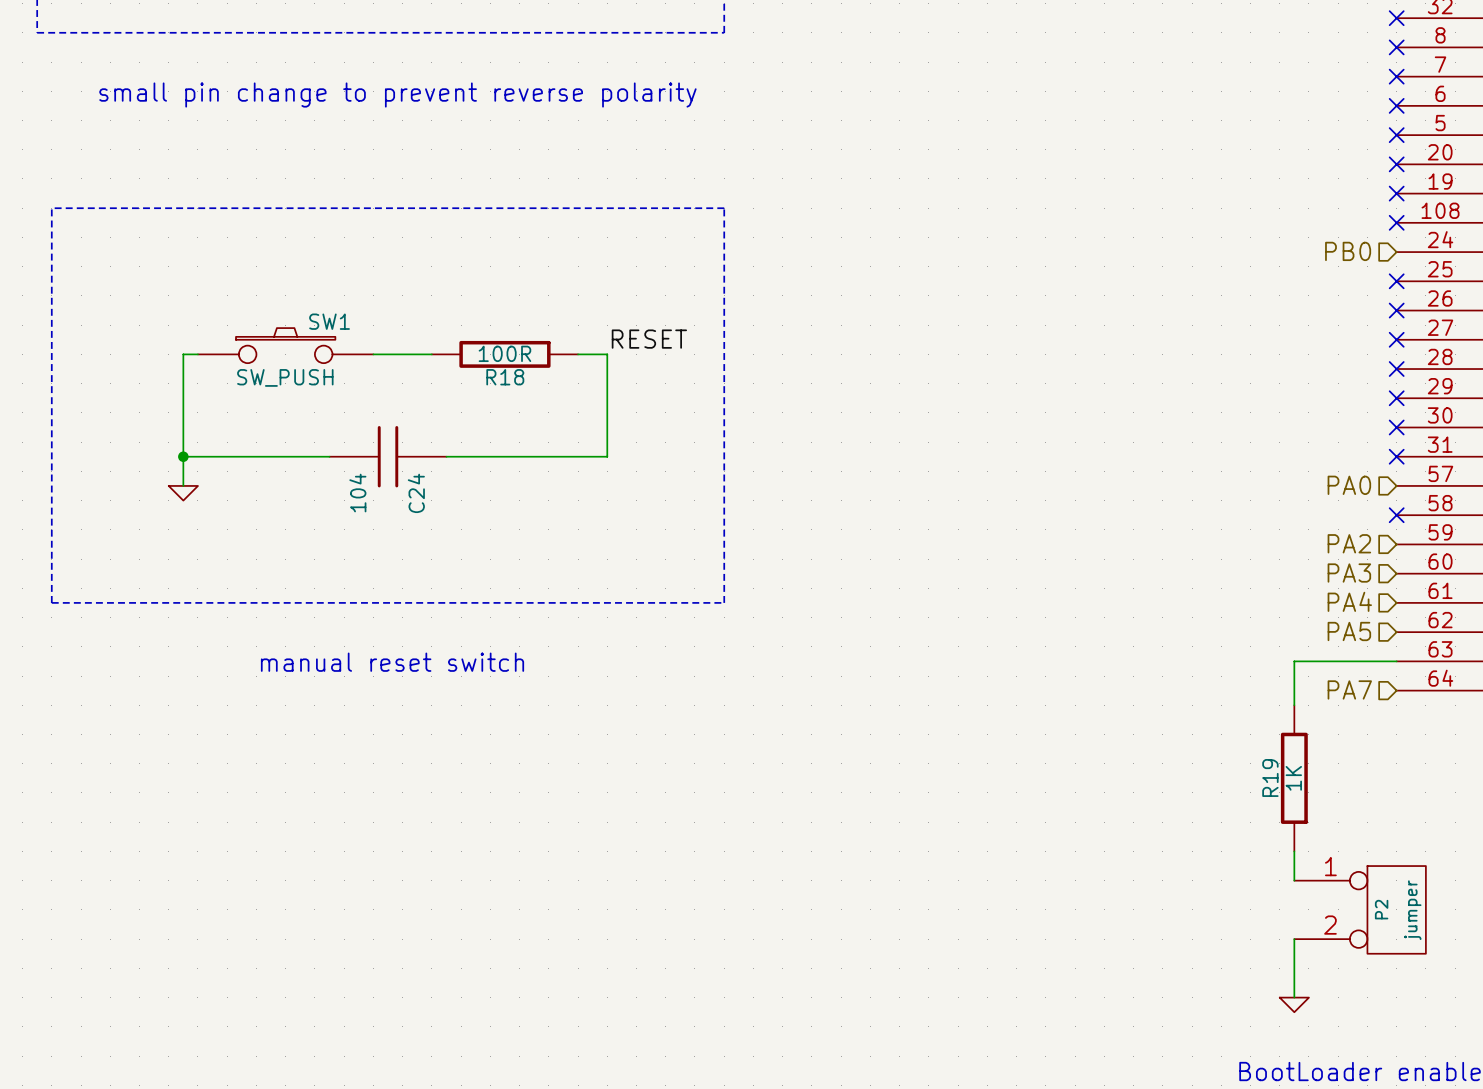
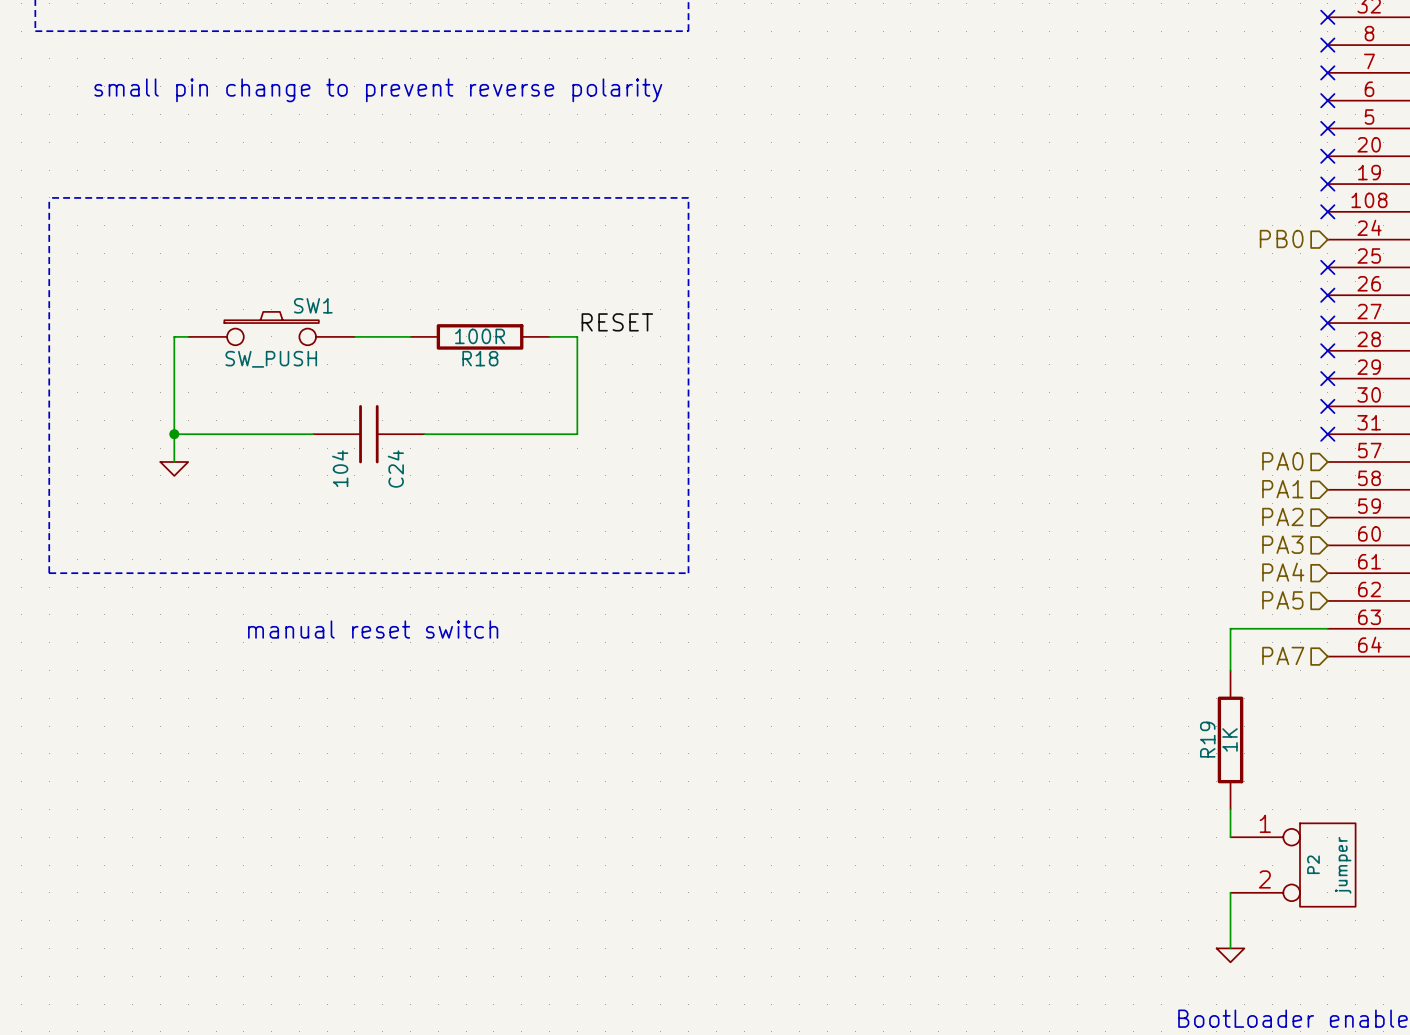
hierarchical label: none -> PA1 (1282, 489)
no-connect mark: (1396, 515) -> none

